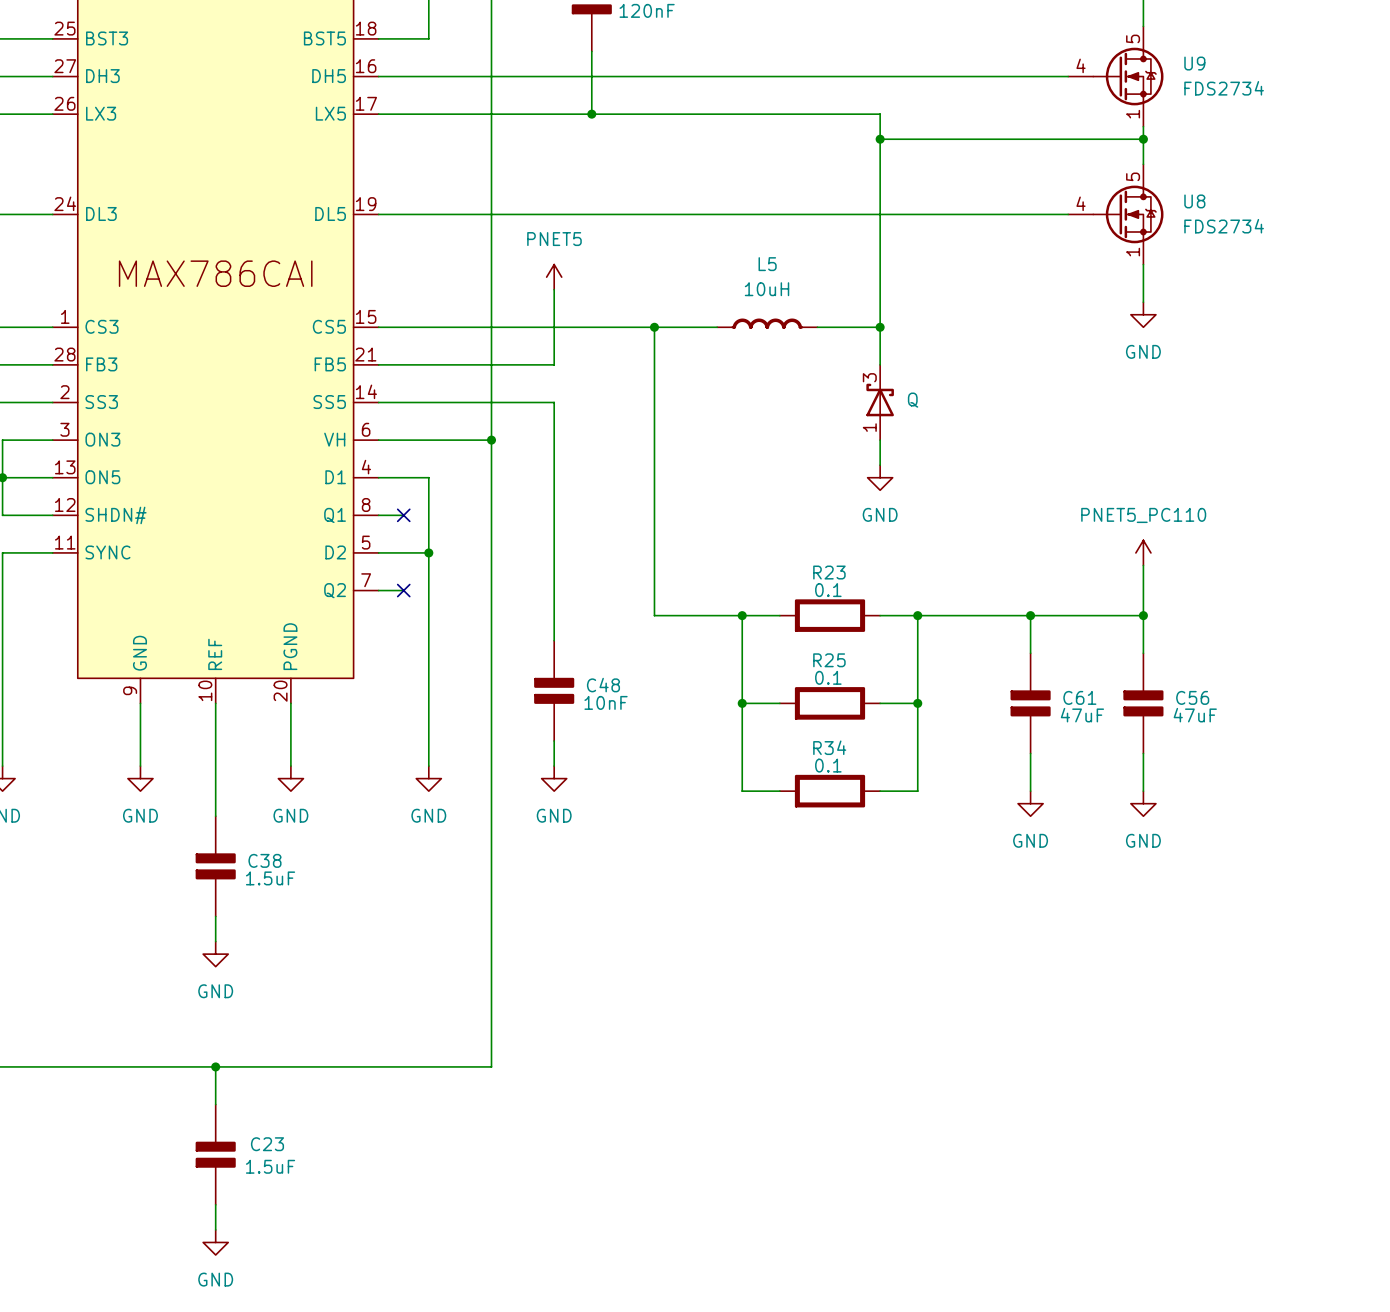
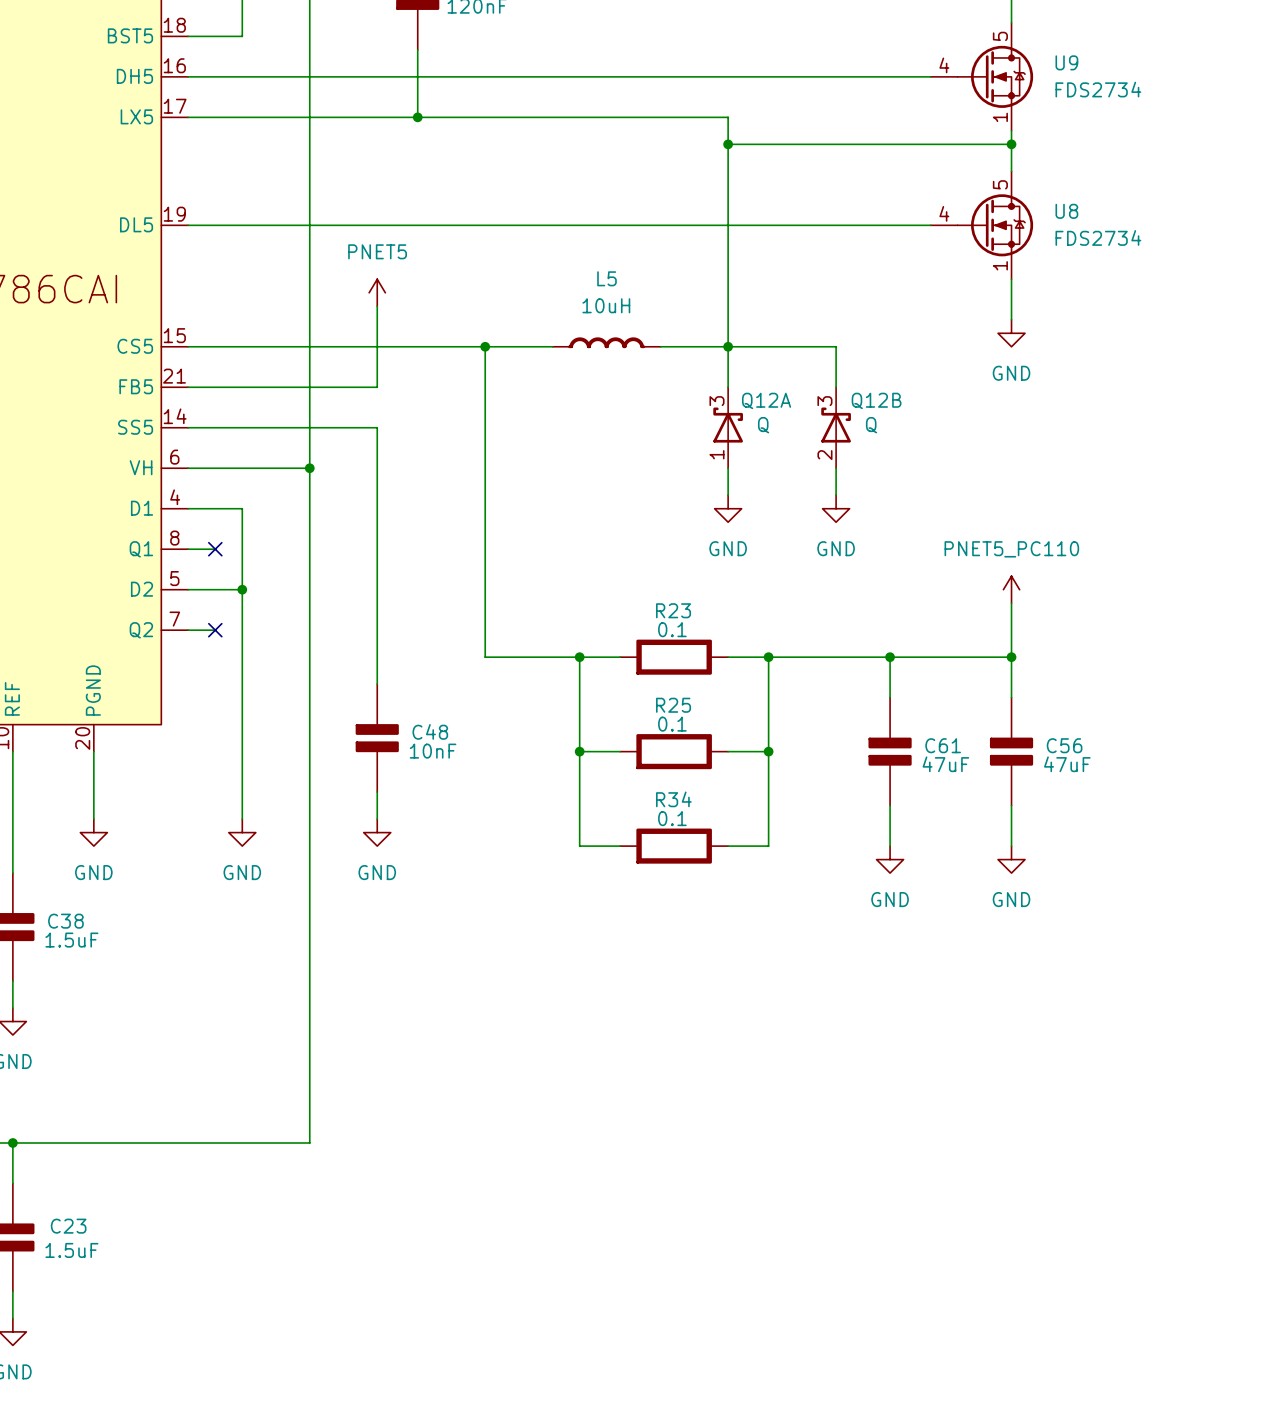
wire: none -> (728, 346) (836, 346) (836, 387)
Q12A name: none -> Q12A (766, 400)
Q12B: none -> Q (836, 427)
wire: none -> (836, 468) (836, 495)
power symbol: none -> GND (836, 508)

